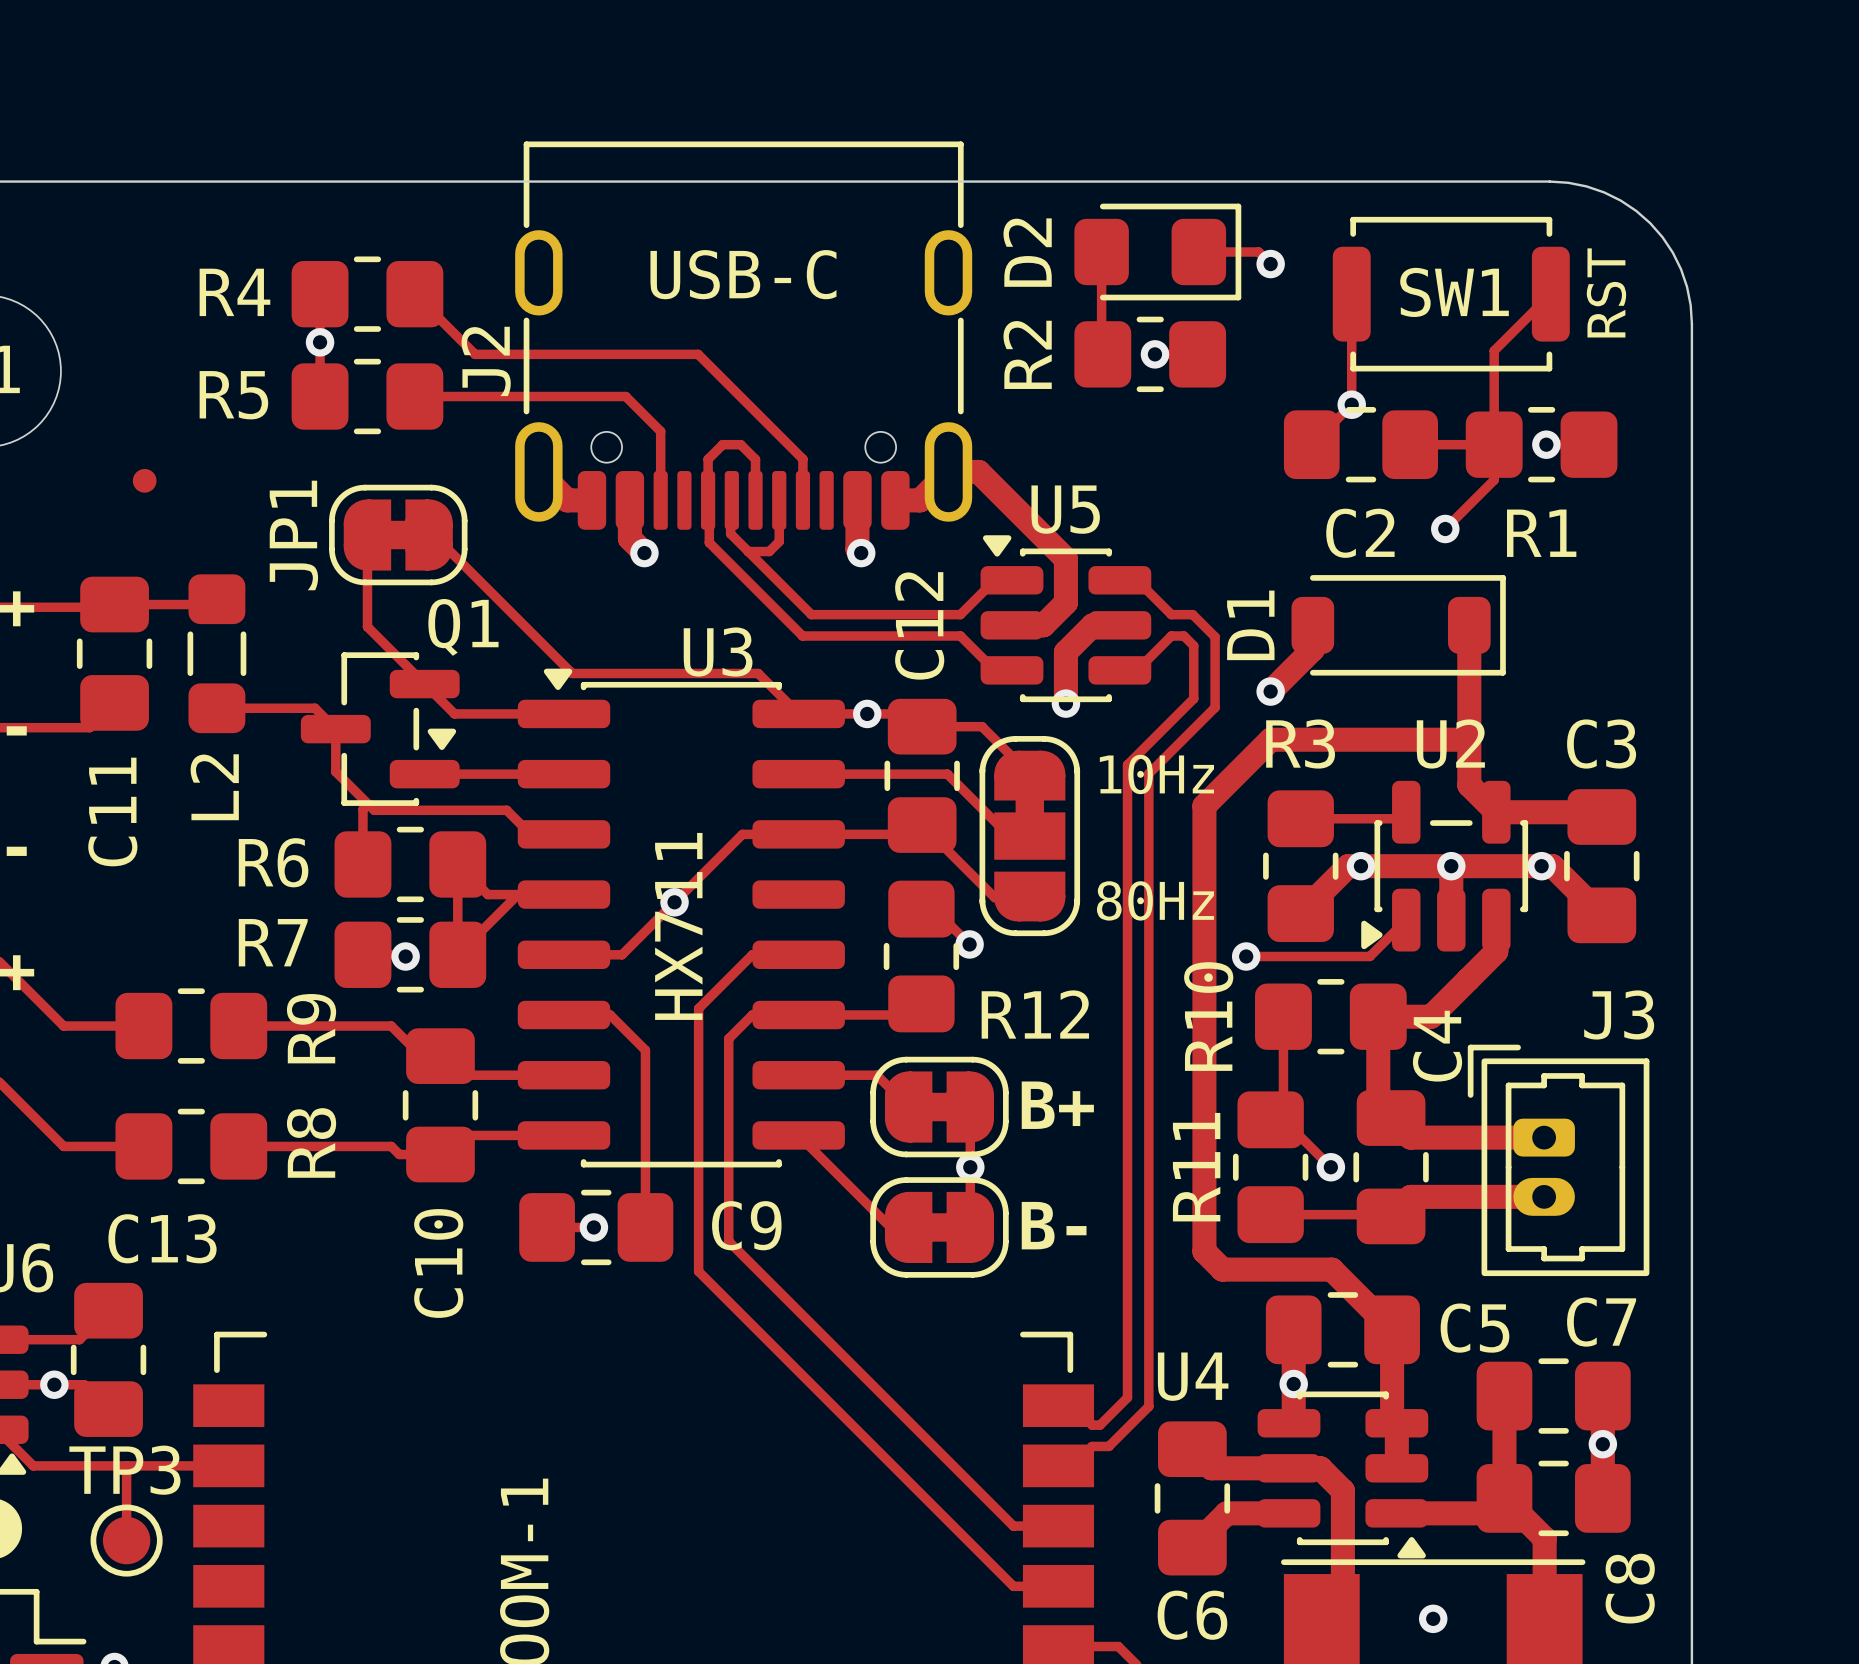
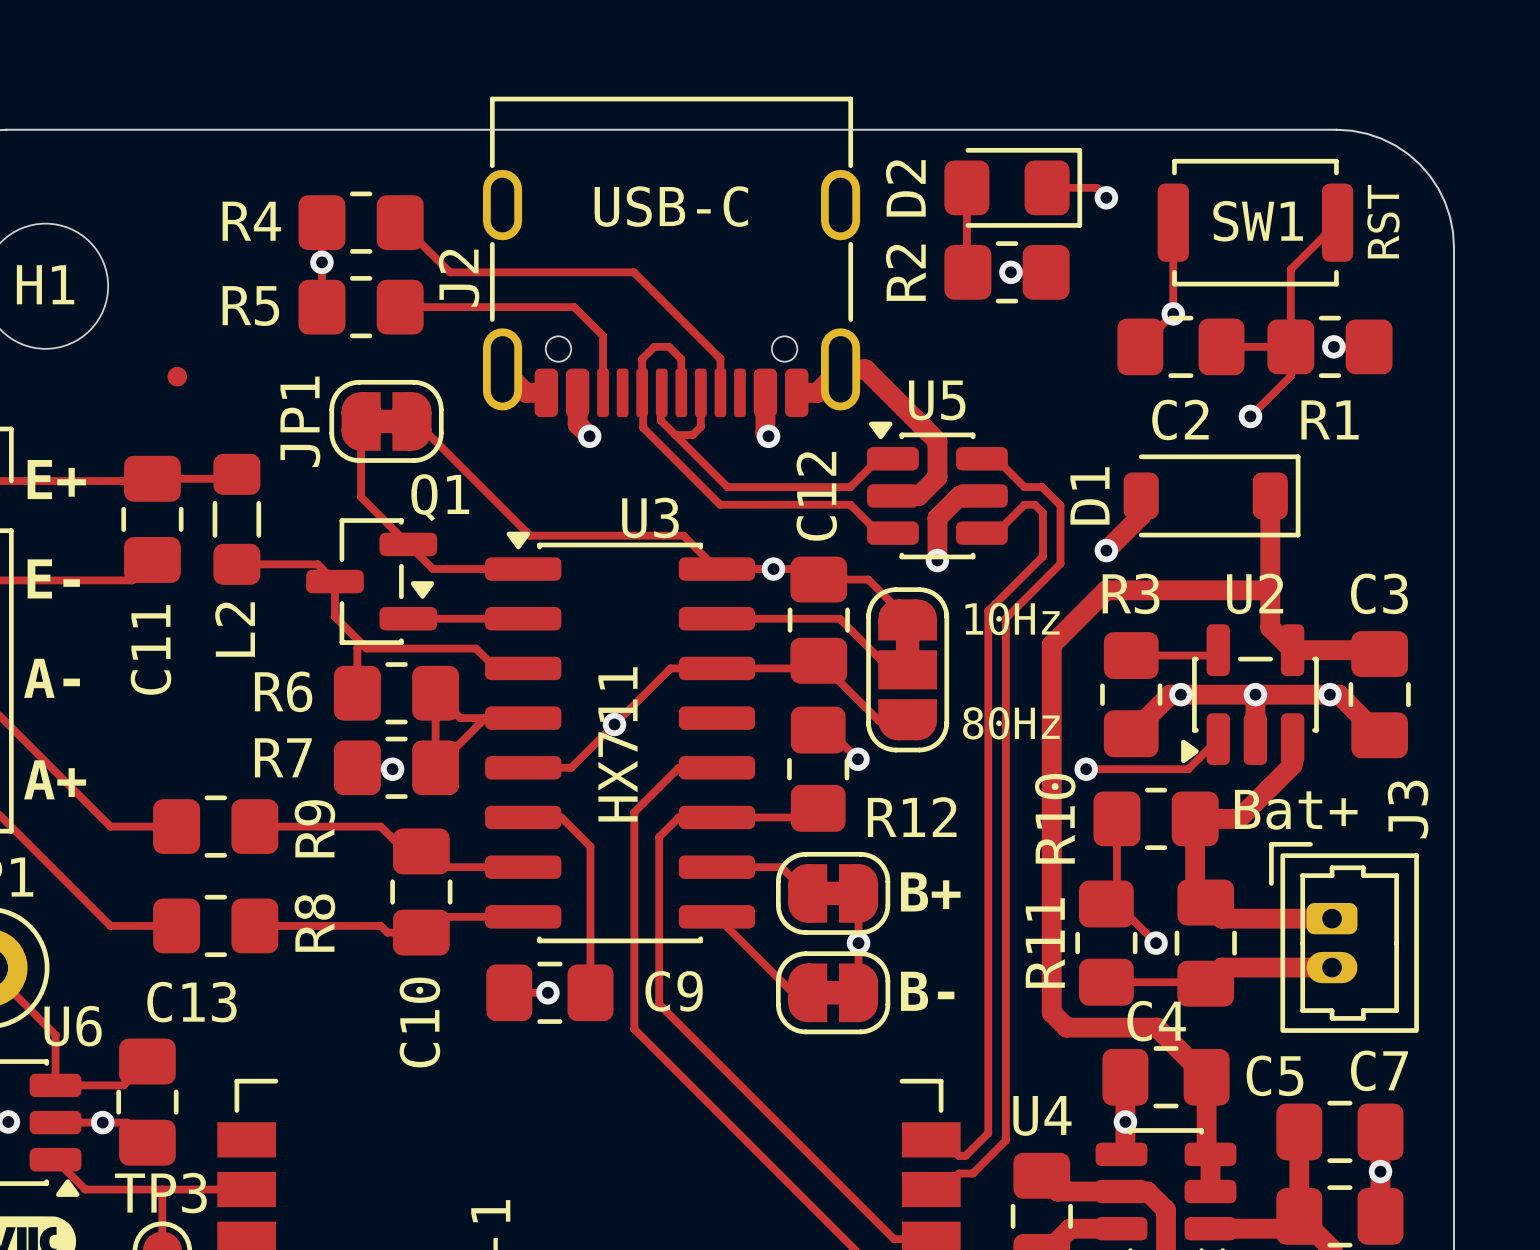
text: none -> Bat+ (1296, 809)
J3 name rotation: 0° (1619, 1014) -> 90° counterclockwise (1408, 809)
C4 name rotation: 0° (1437, 1046) -> 90° clockwise (1156, 1021)
C4 name position: C4 (1437, 1046) -> C4 (1156, 1021)

